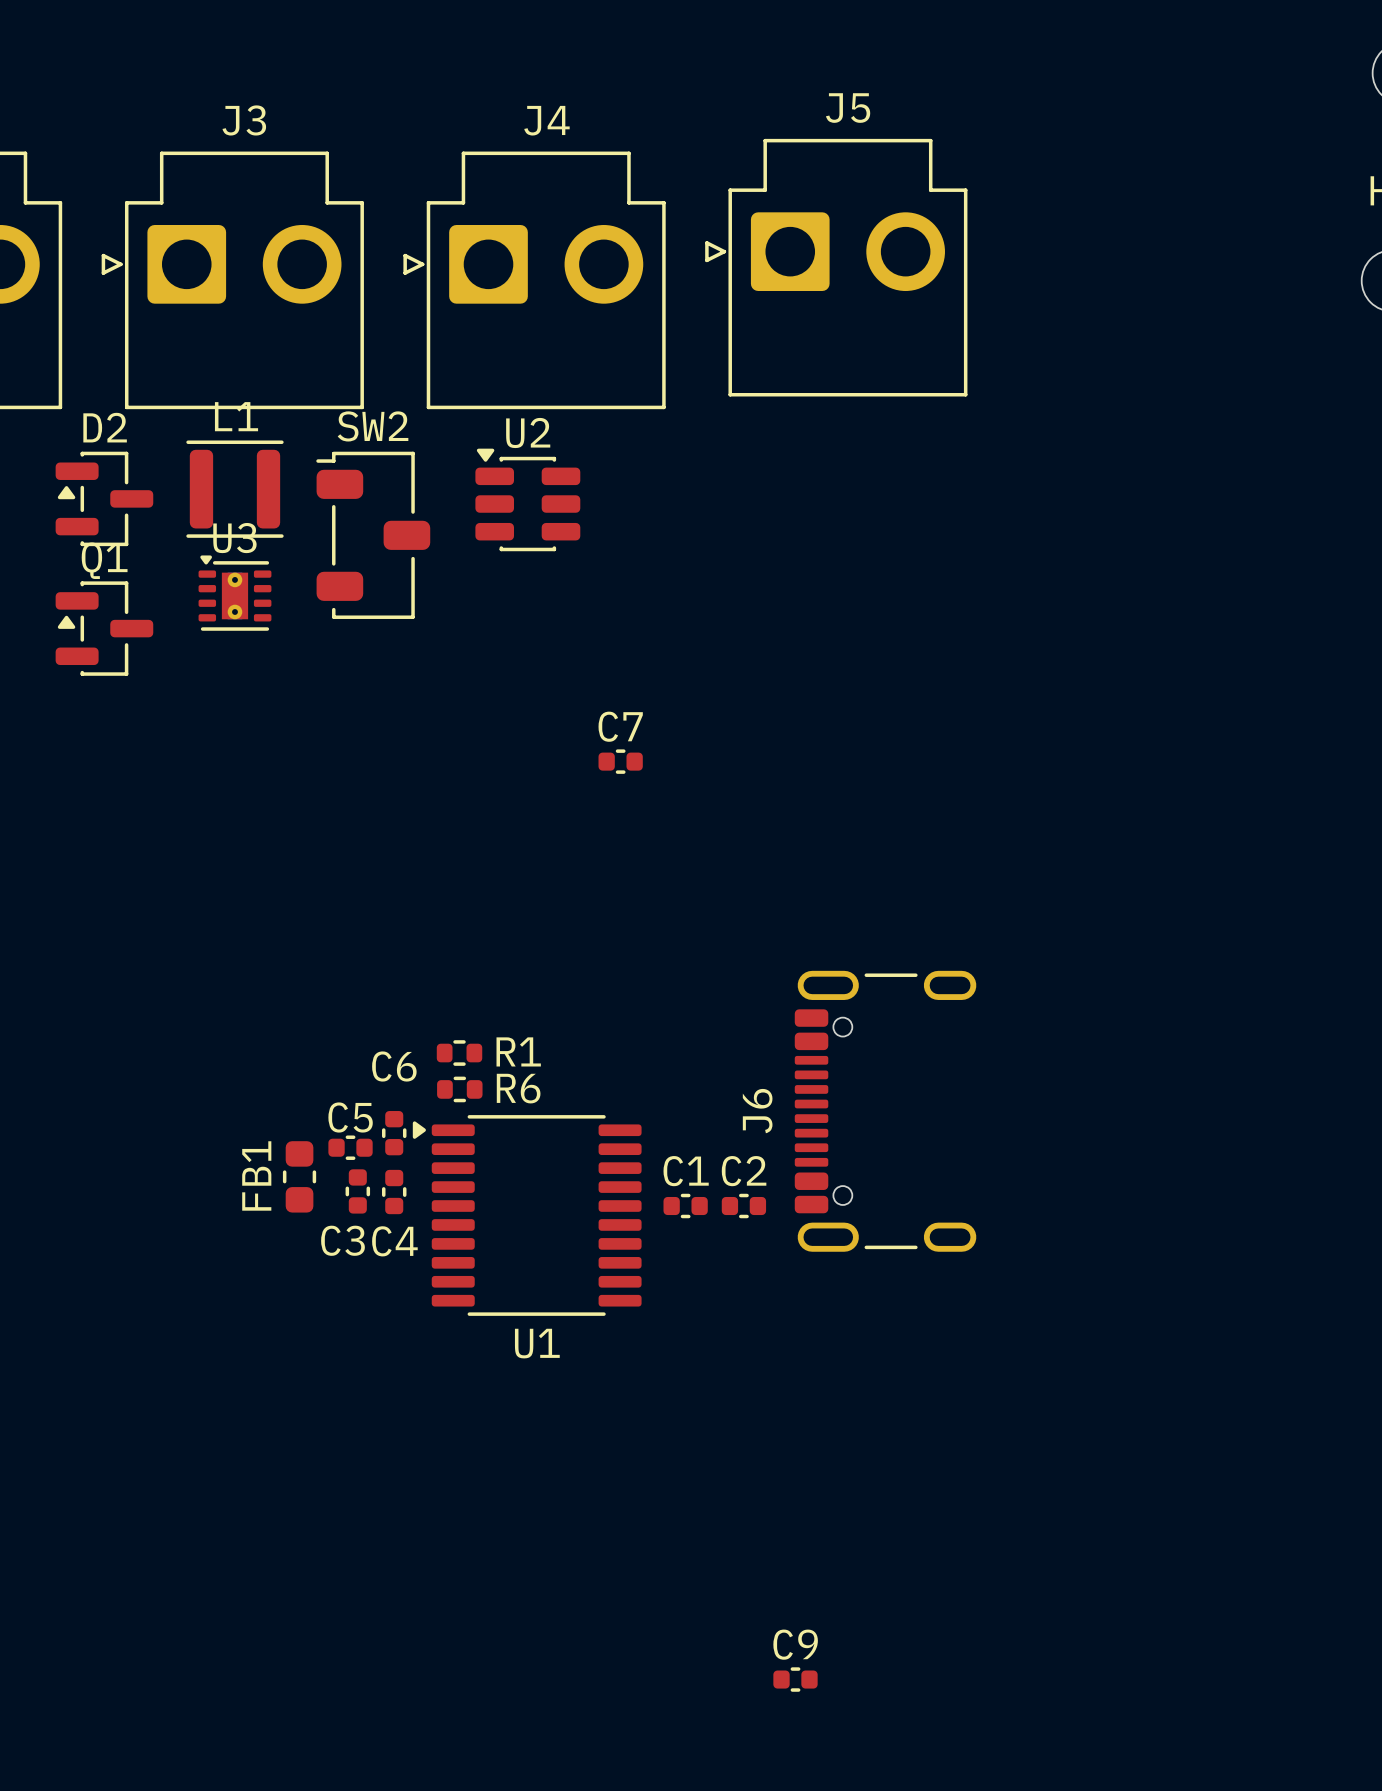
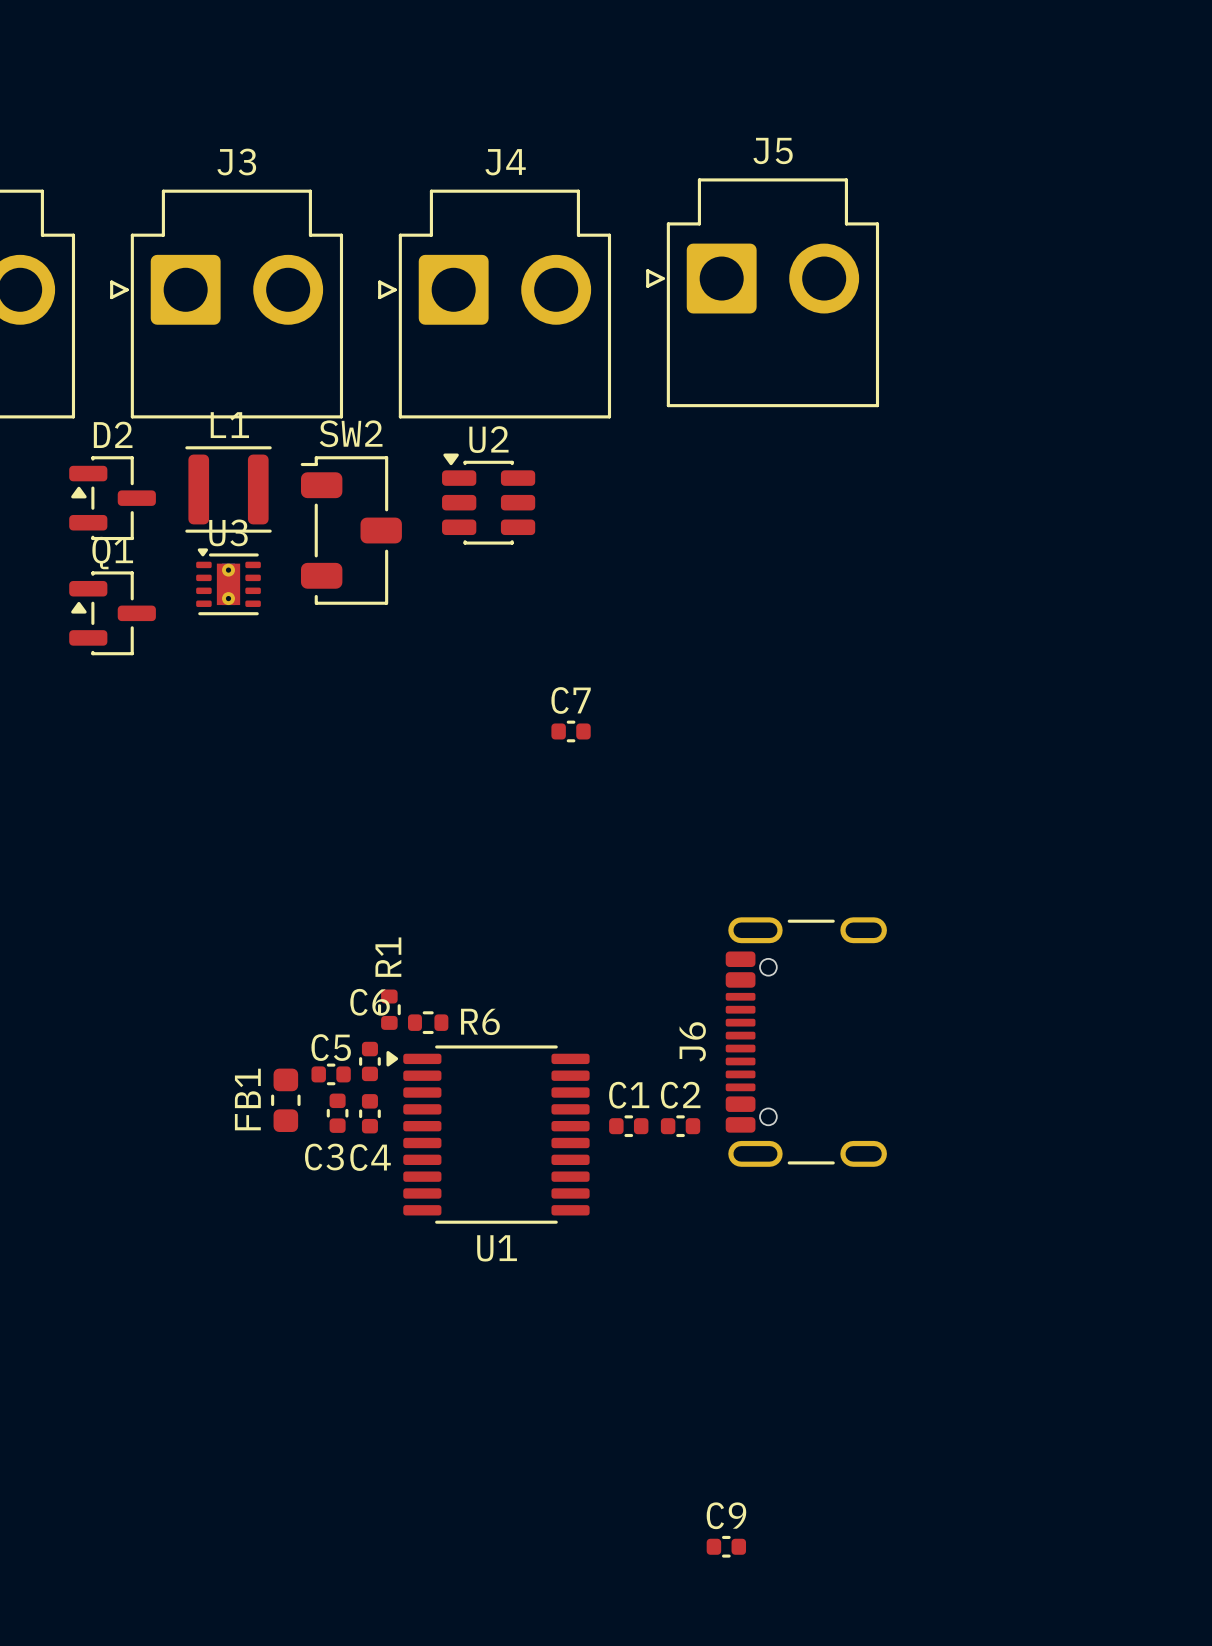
R1 name position: R1 (518, 1051) -> R1 (388, 957)
R1 rotation: 0° (459, 1053) -> 90° clockwise (389, 1009)
R1 position: (459, 1053) -> (389, 1009)

